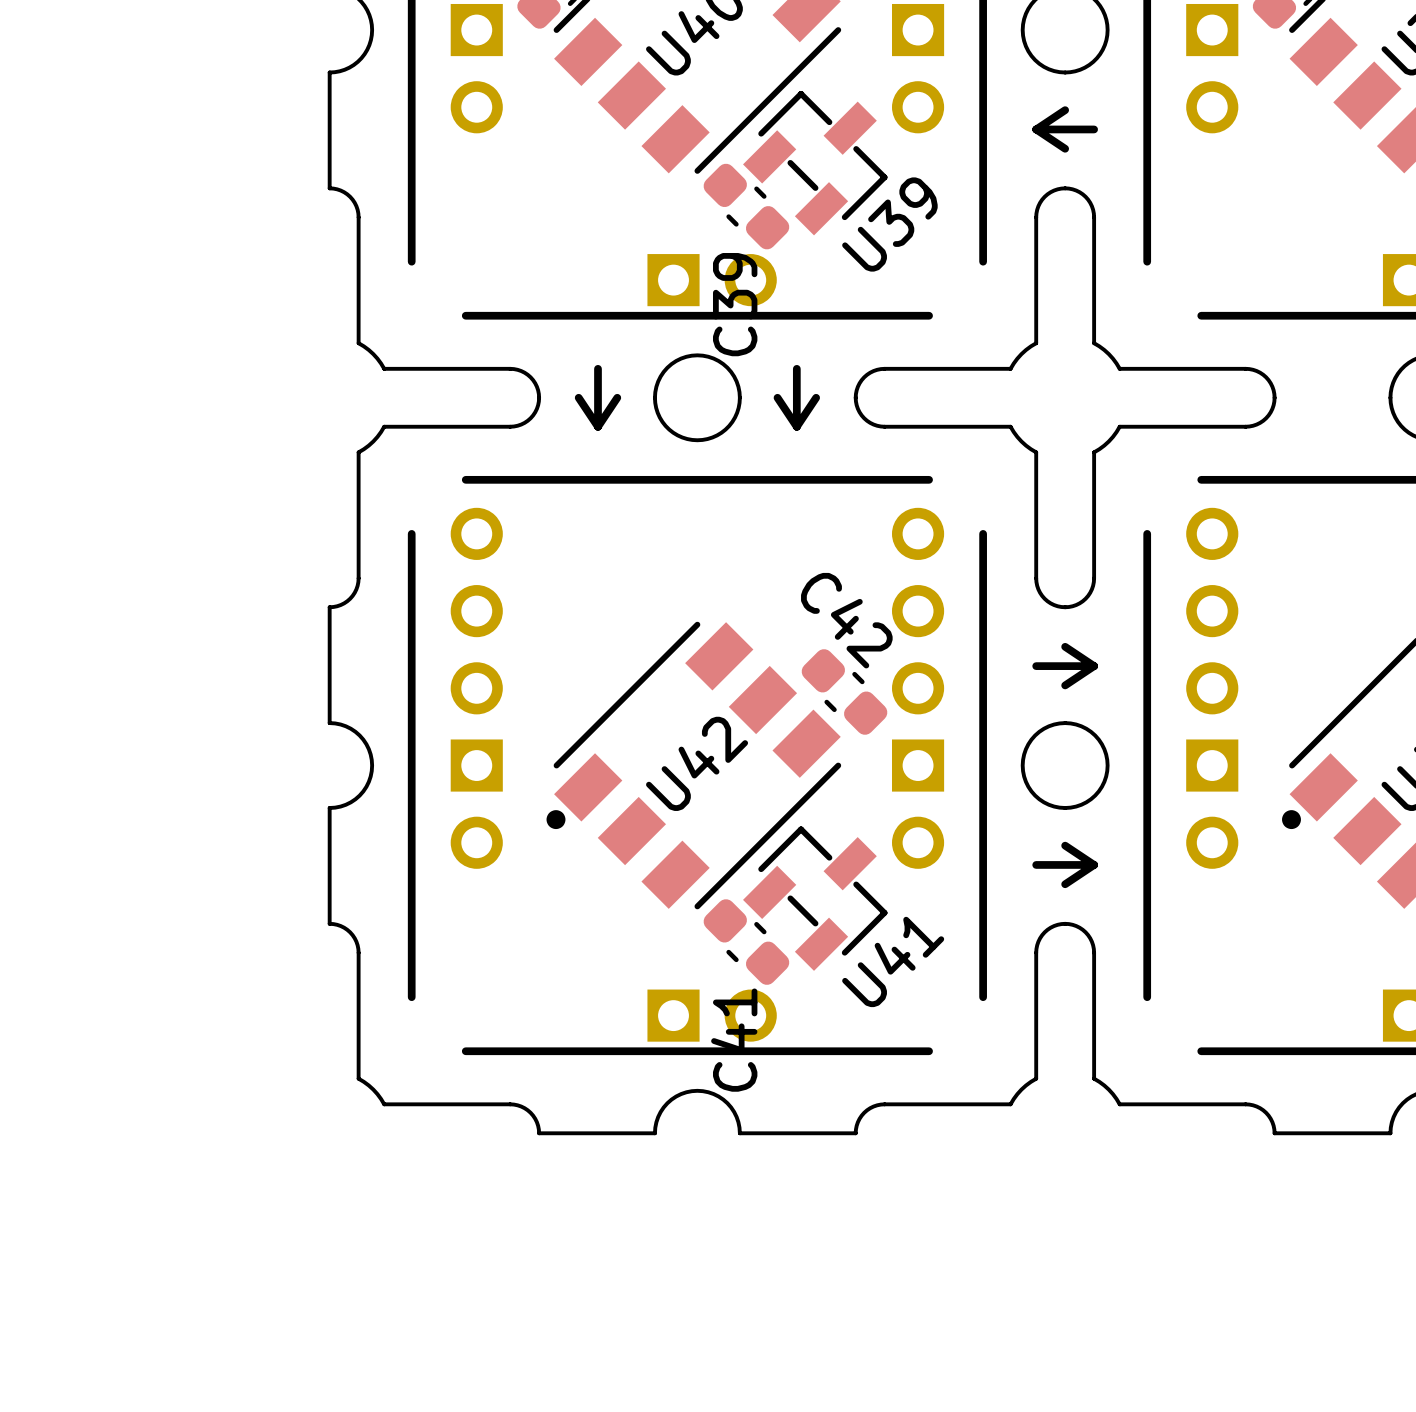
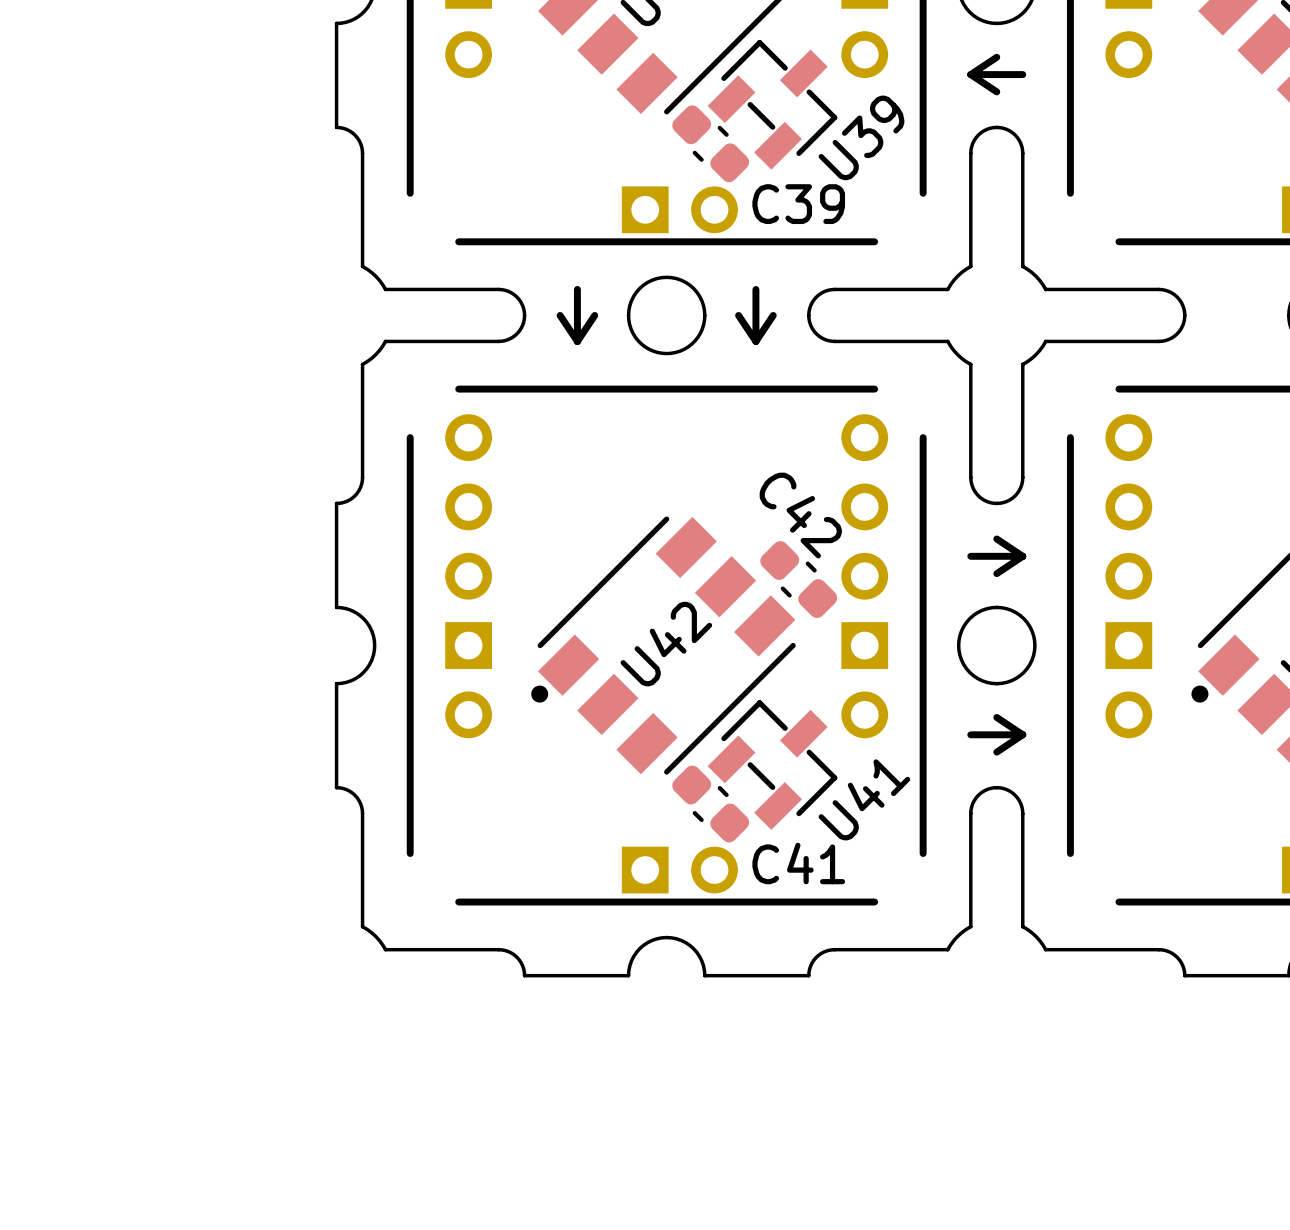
U39 name position: U39 (889, 224) -> U39 (861, 137)
C39 name rotation: 0° (735, 304) -> 90° clockwise (798, 204)
U41 name position: U41 (893, 961) -> U41 (864, 799)
C41 name rotation: 0° (734, 1040) -> 90° clockwise (798, 863)

